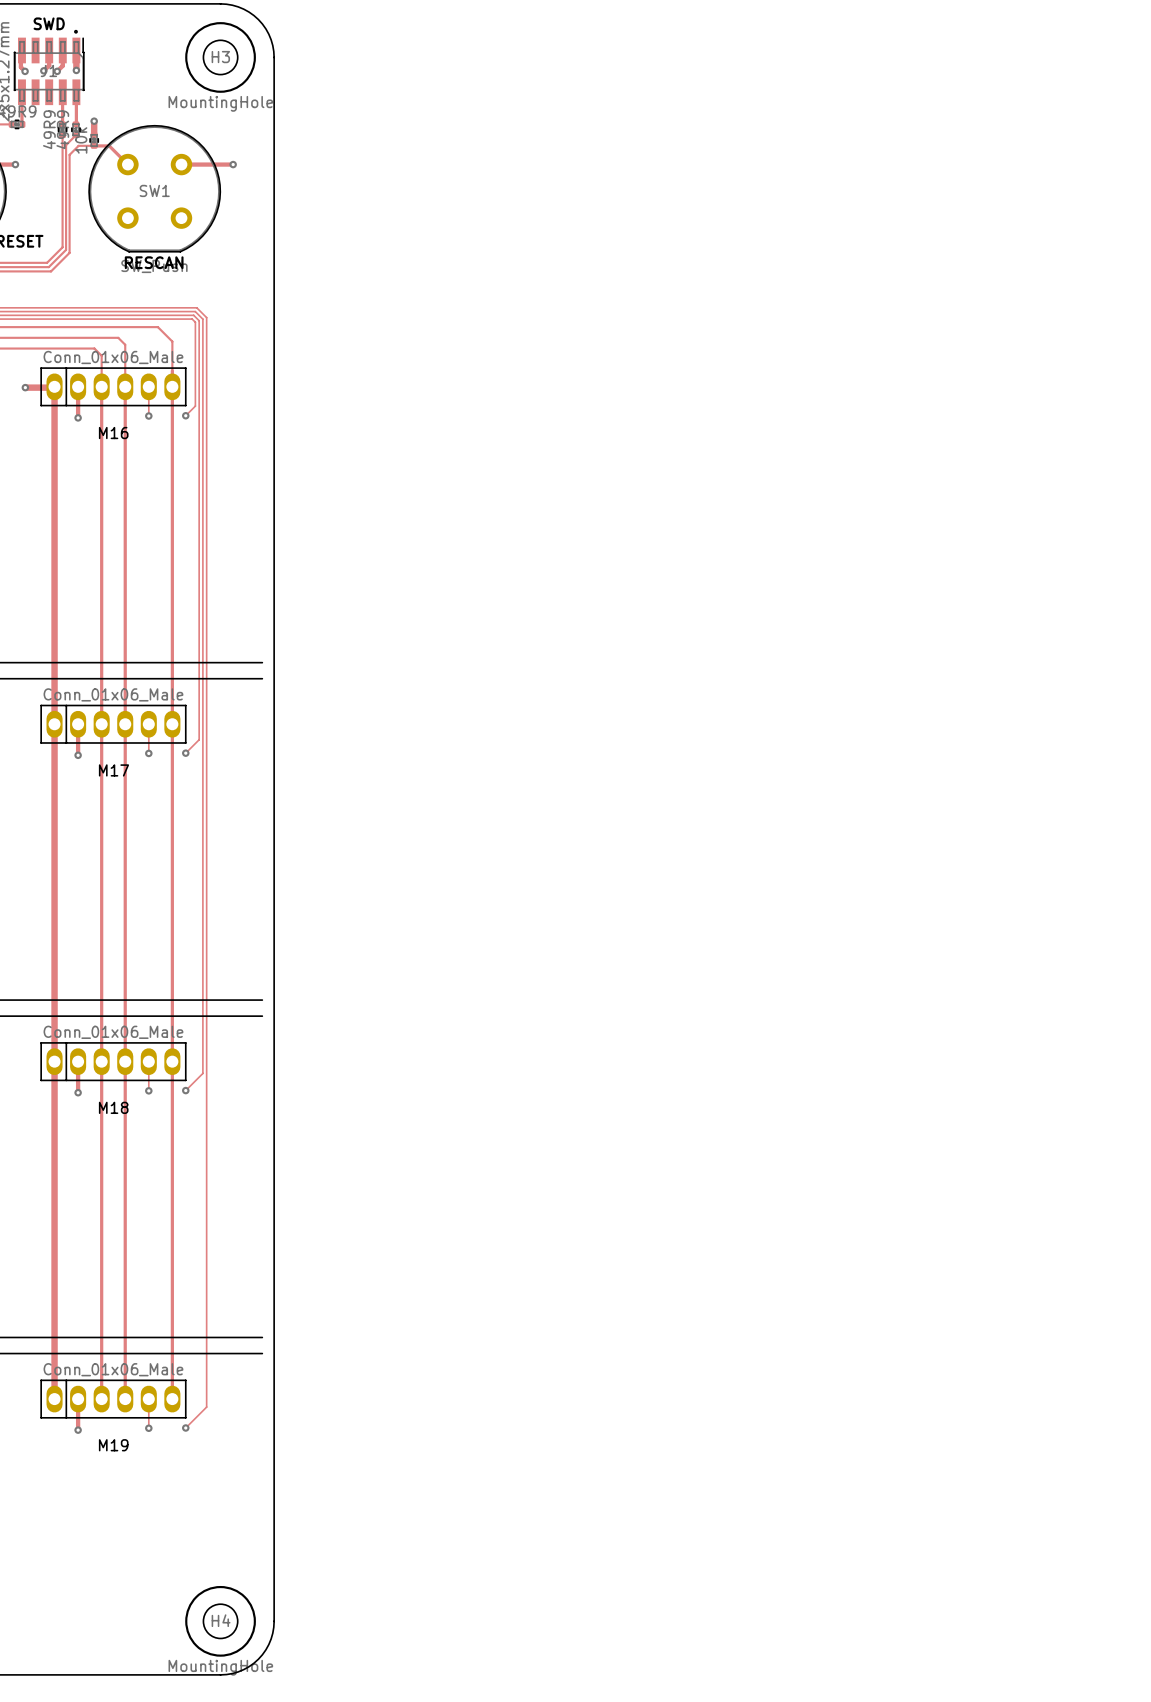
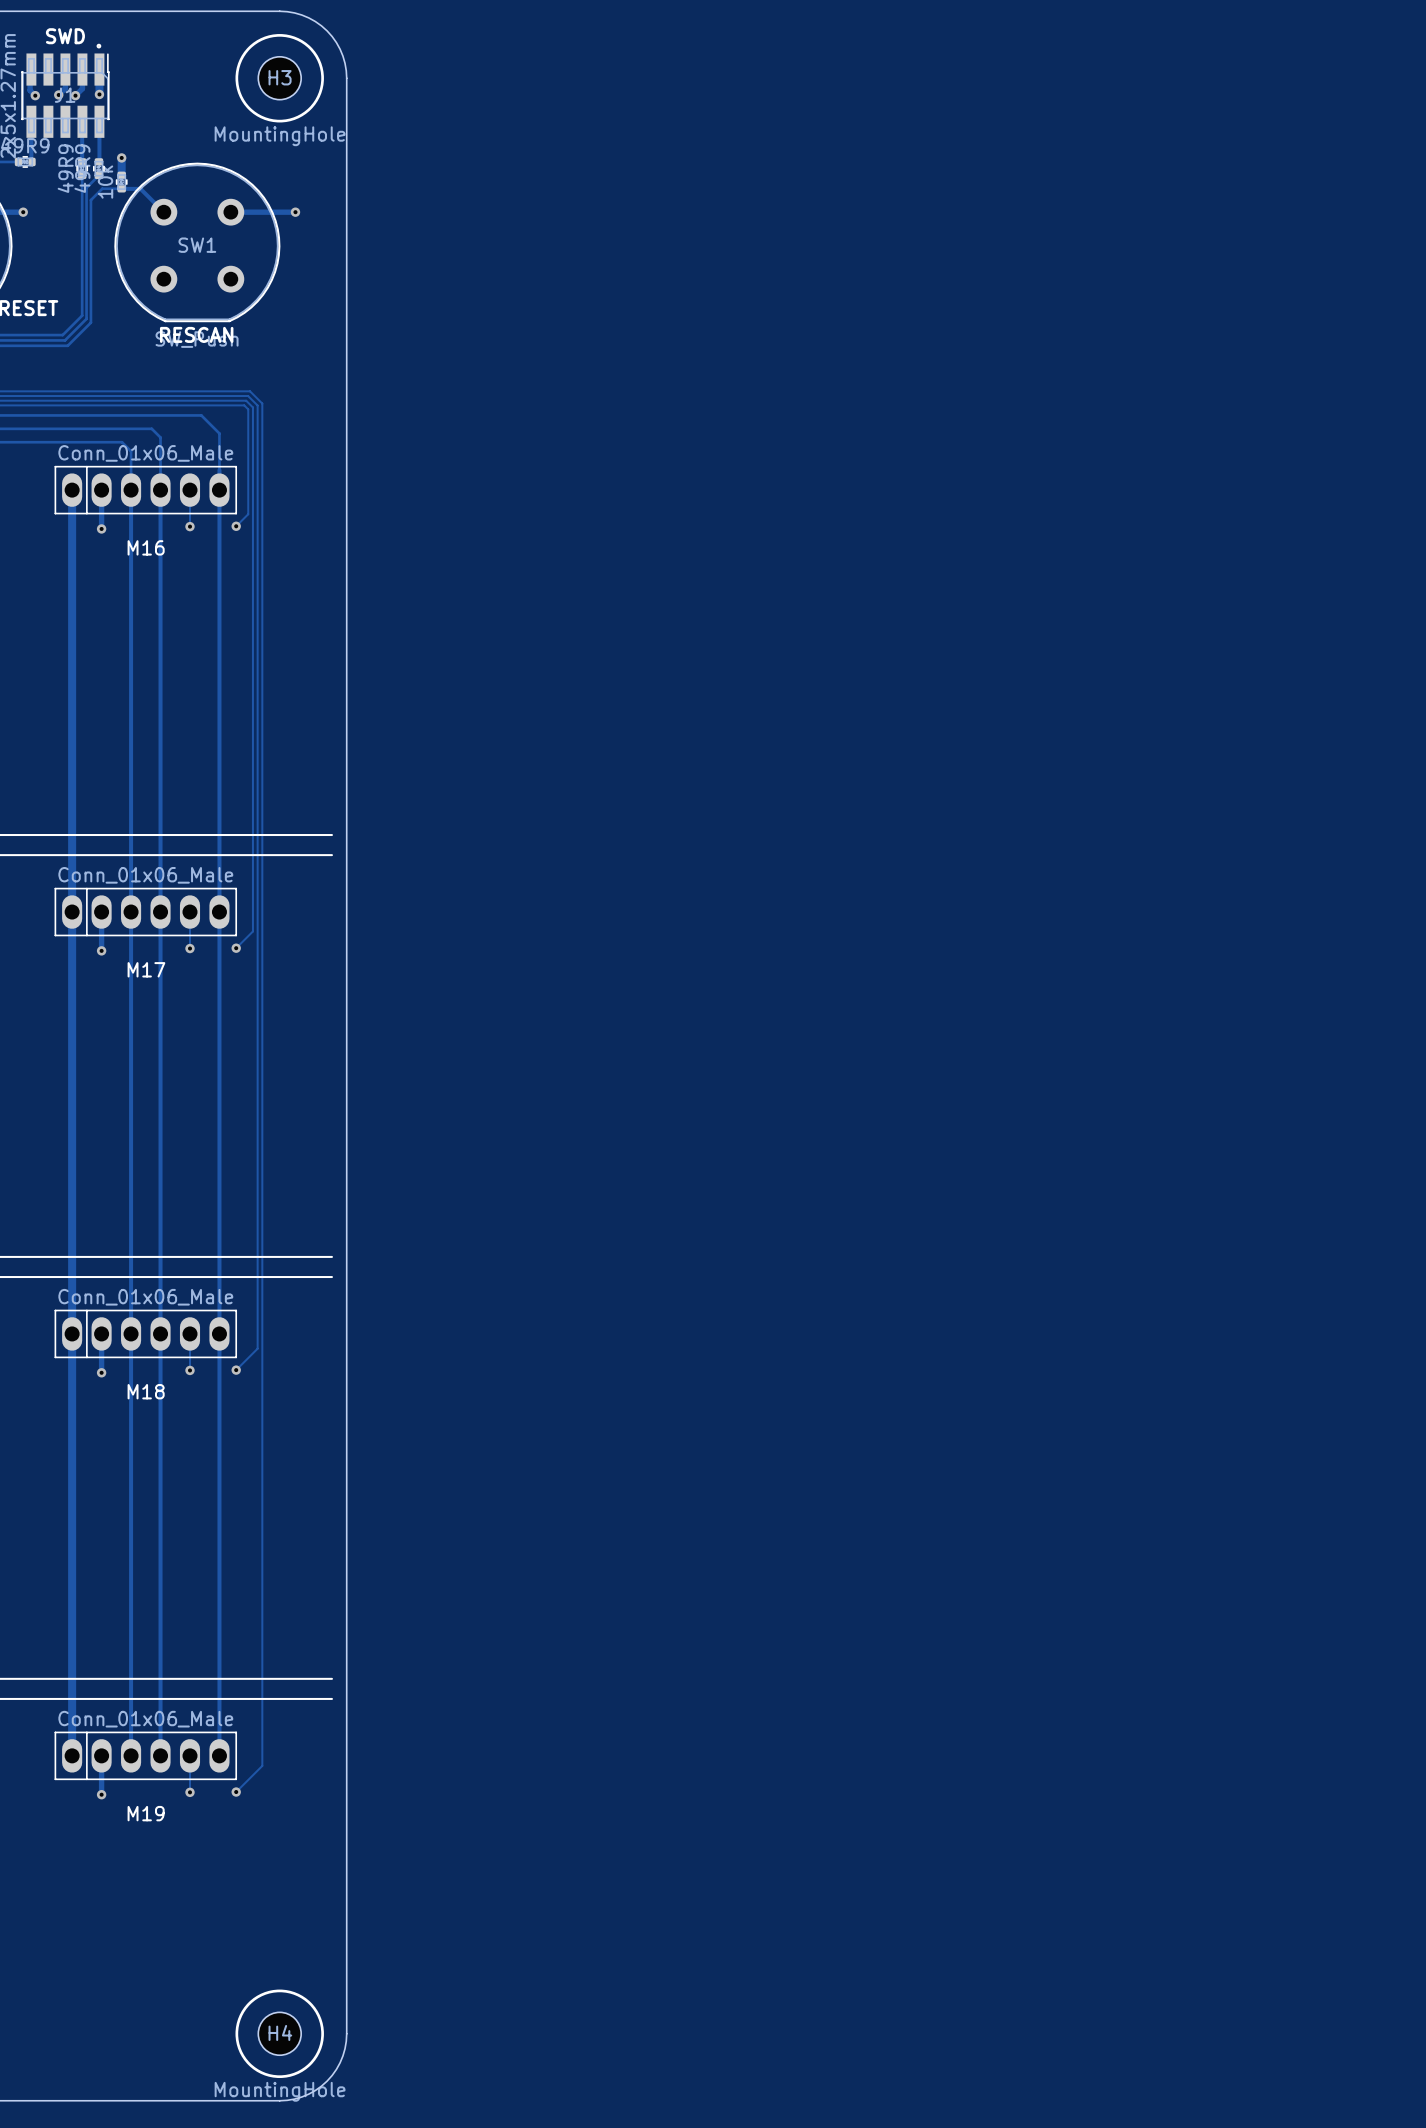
track: (25, 387) (53, 387) -> none
via: (25, 387) -> none

